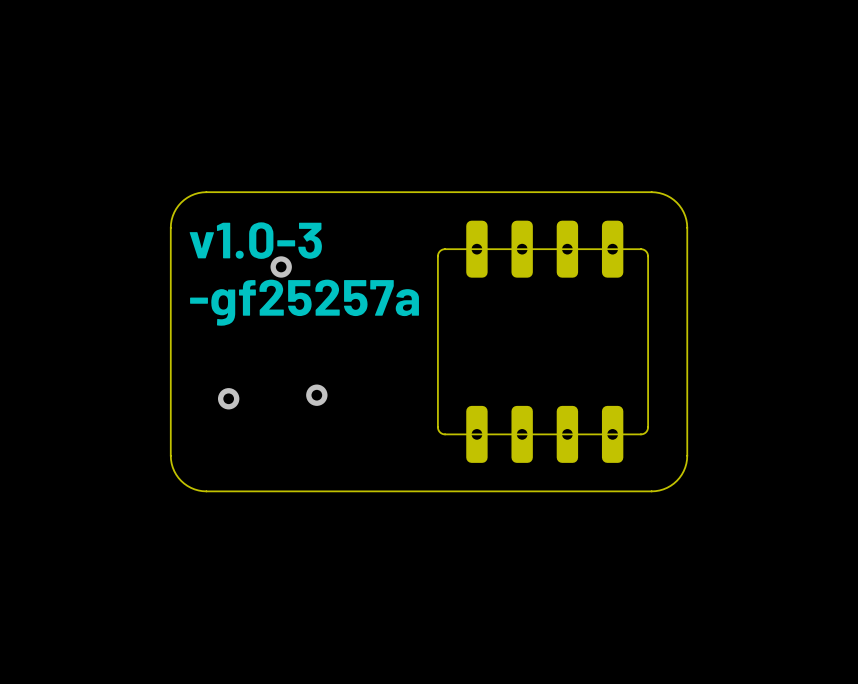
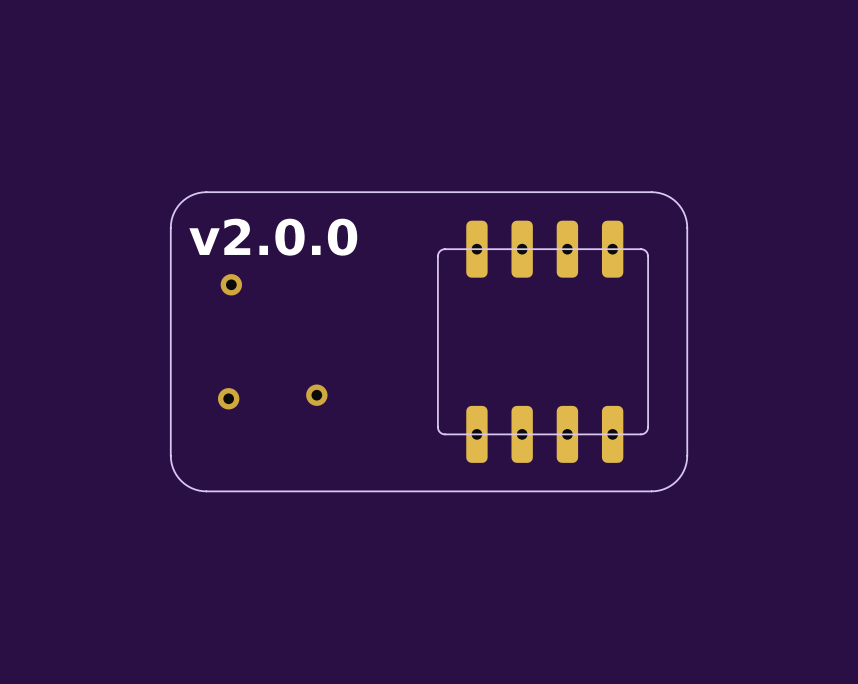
text: v1.0-3 (255, 240) -> v2.0.0 (273, 237)
via position: (281, 266) -> (231, 284)
text: -gf25257a (304, 302) -> none

